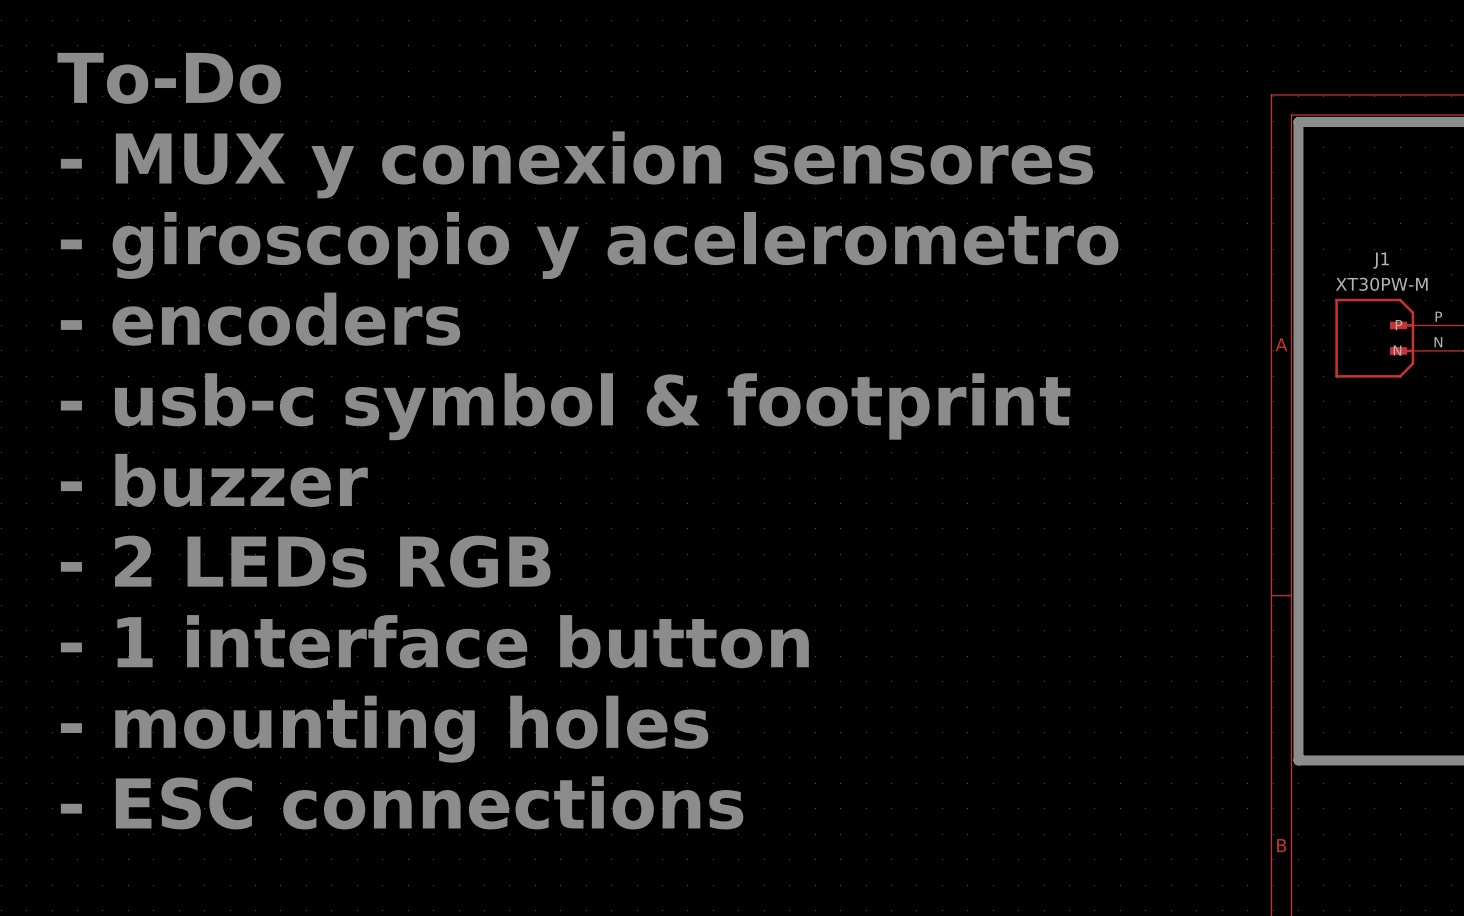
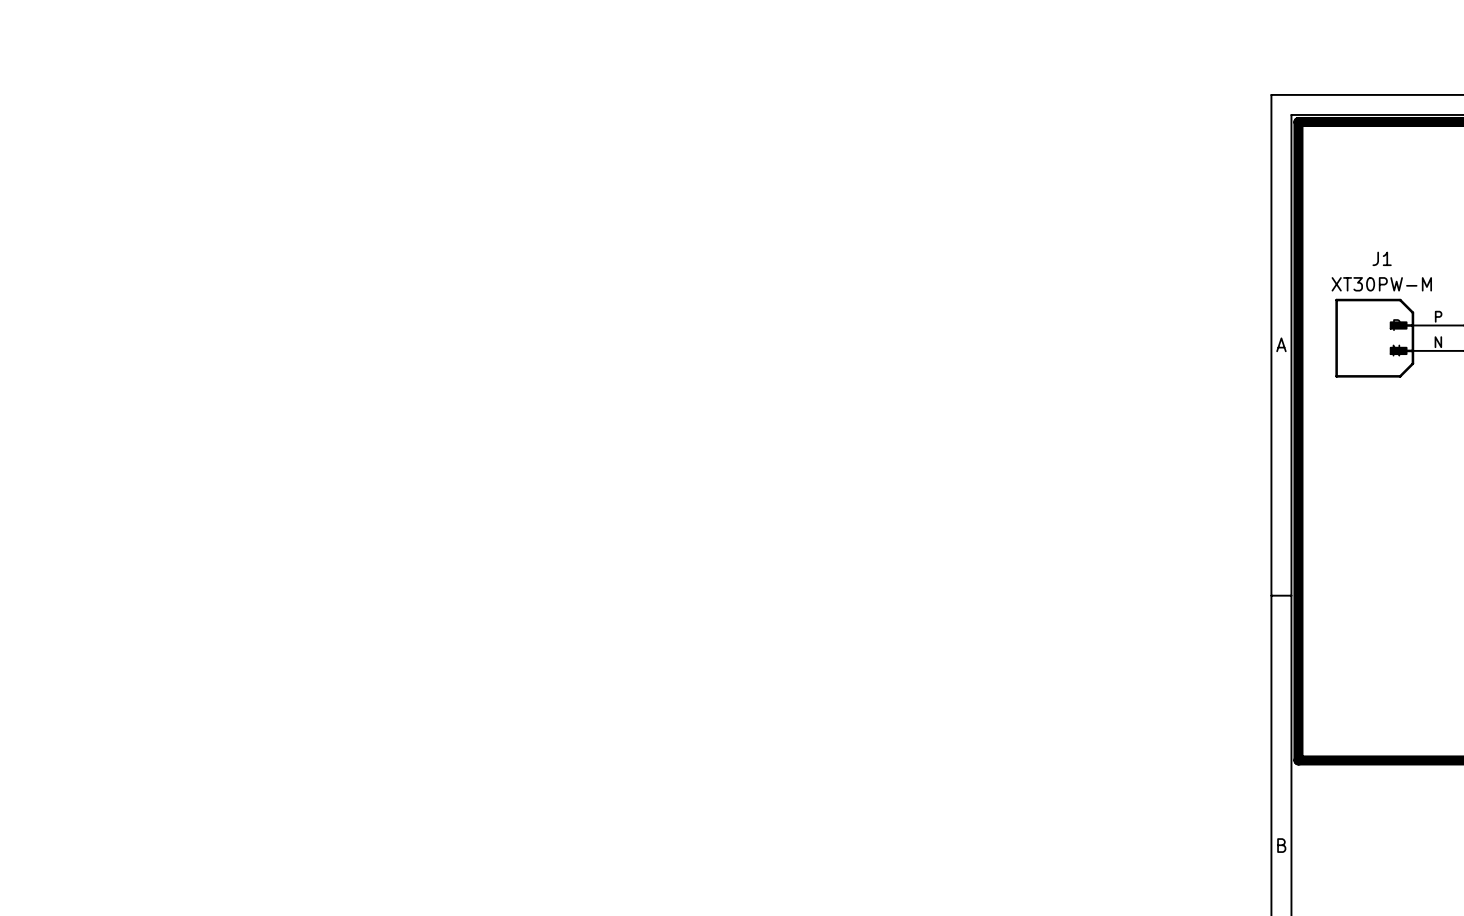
text: To-Do (169, 78) -> none
text: - MUX y conexion sensores (576, 164) -> none
text: - giroscopio y acelerometro (589, 245) -> none
text: - encoders (260, 319) -> none
text: - usb-c symbol & footprint (565, 406) -> none
text: - buzzer (214, 480) -> none
text: - 2 LEDs RGB (305, 561) -> none
text: - 1 interface button (434, 641) -> none
text: - mounting holes (384, 729) -> none
text: - ESC connections (402, 802) -> none

